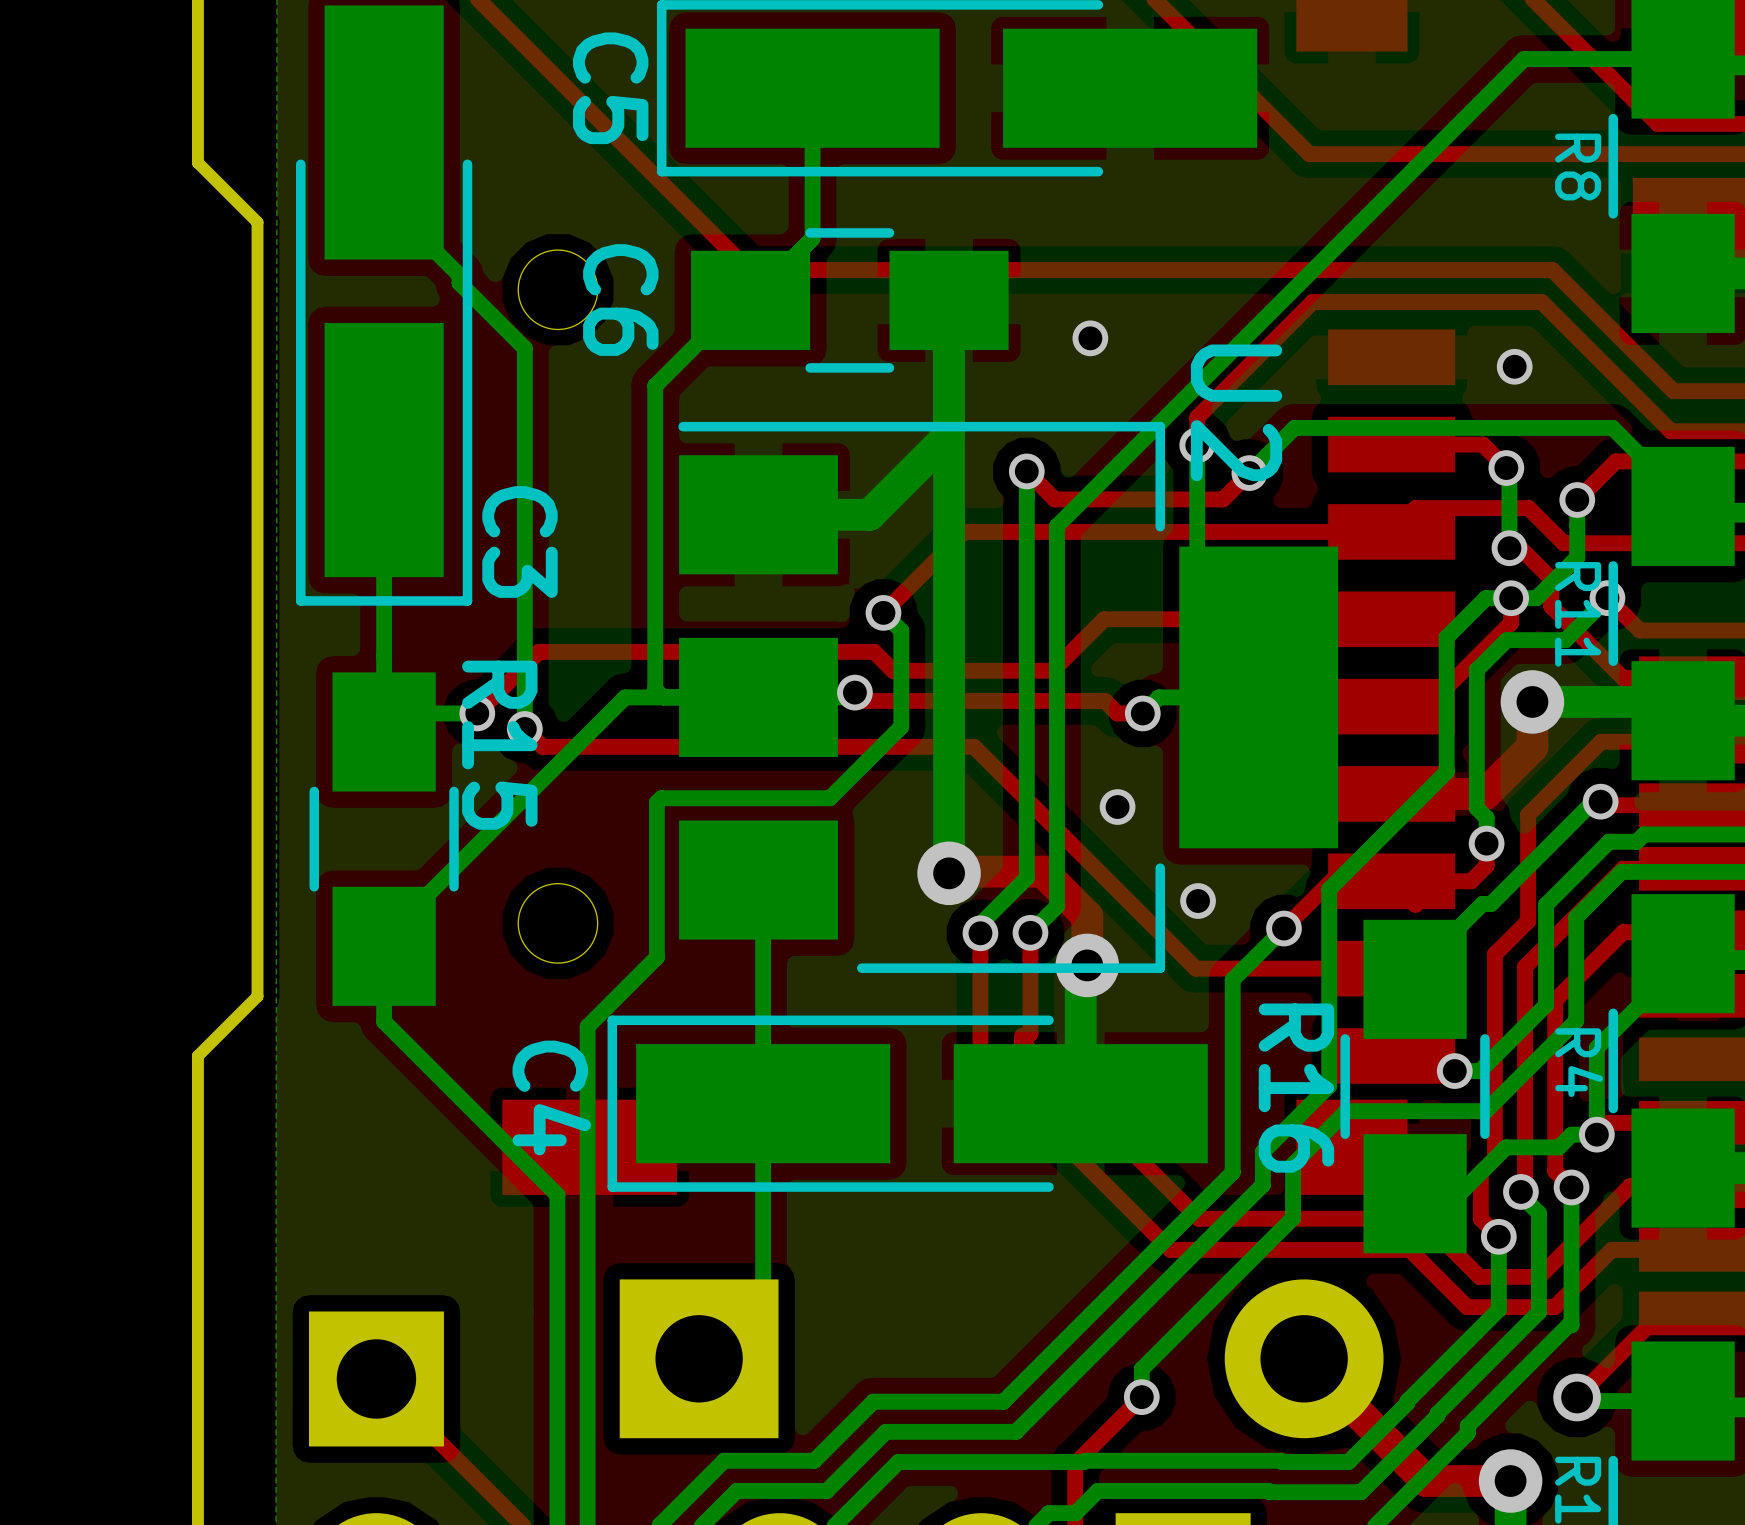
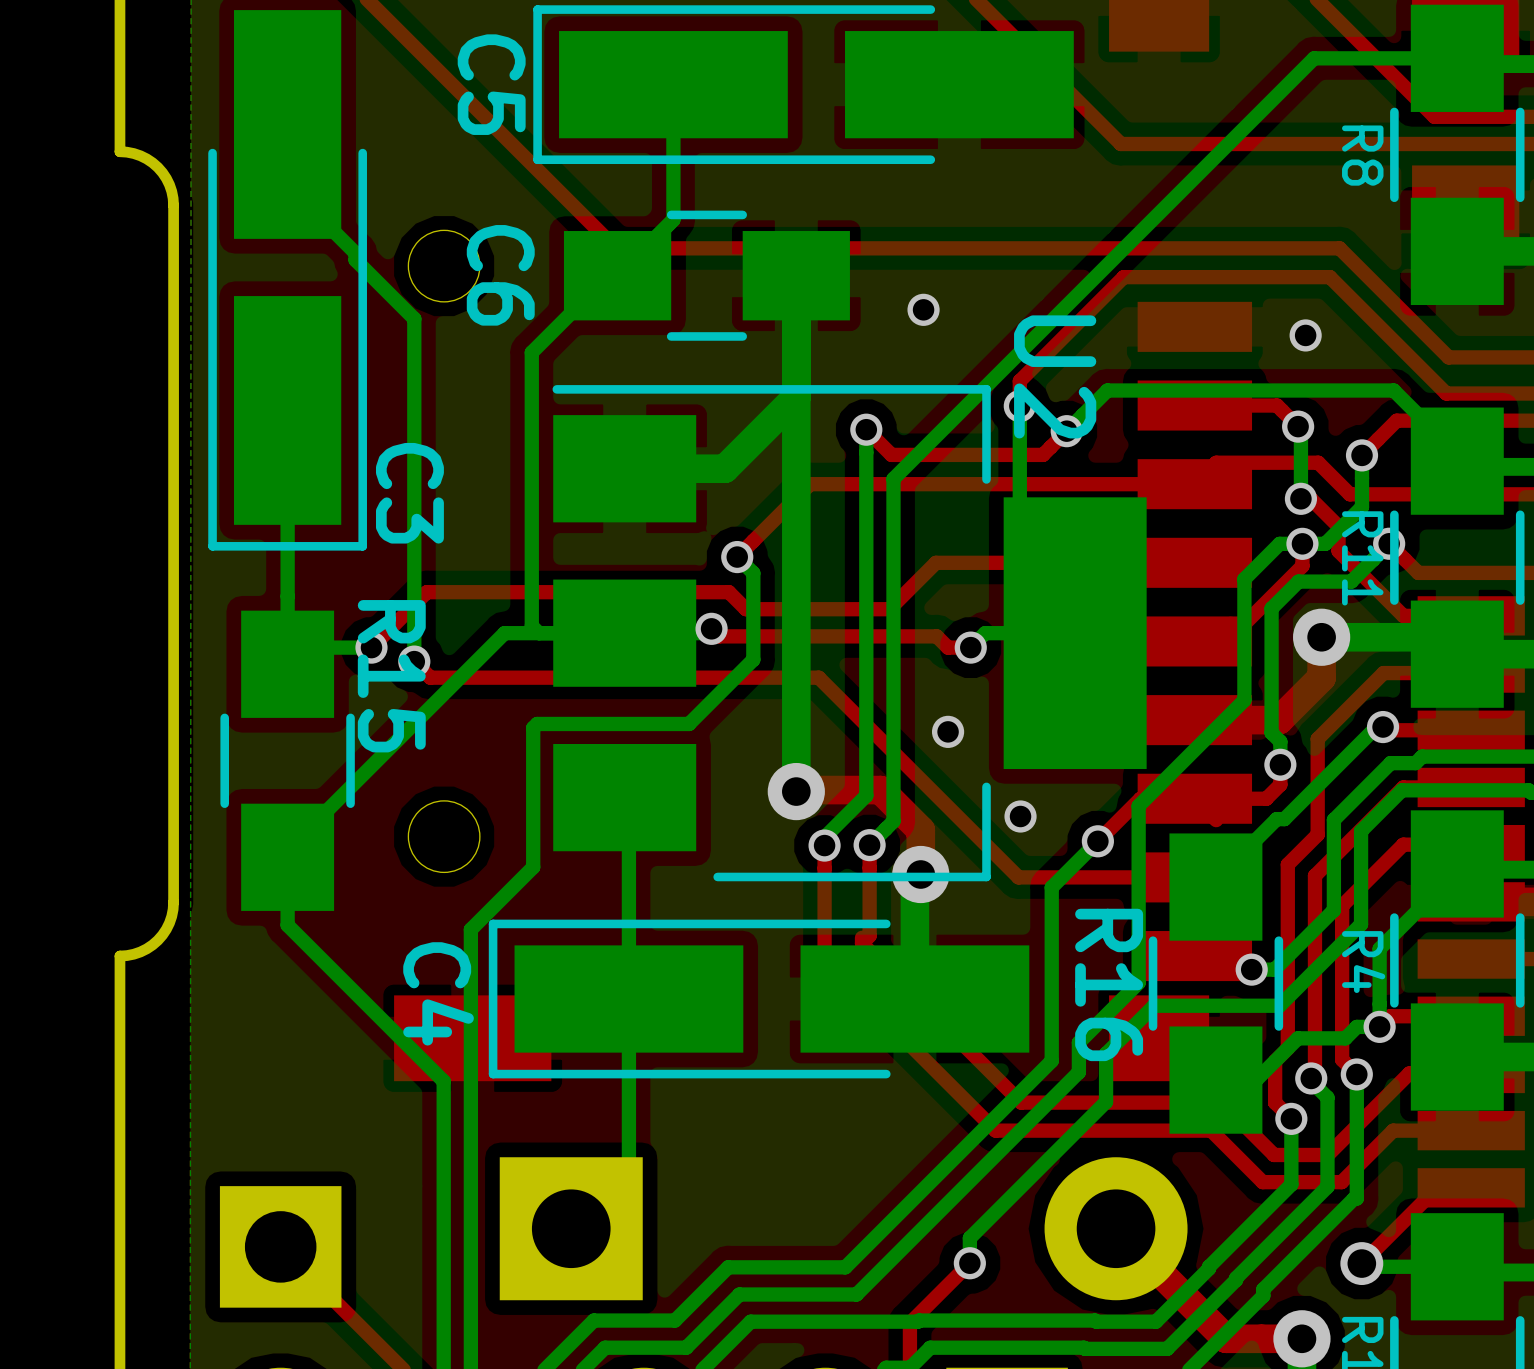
board edge: (197, 162) (257, 222) -> (119, 151) (140, 155) (157, 167) (169, 184) (173, 205)
board edge: (257, 996) (197, 1055) -> (173, 902) (169, 922) (157, 940) (140, 951) (119, 956)

